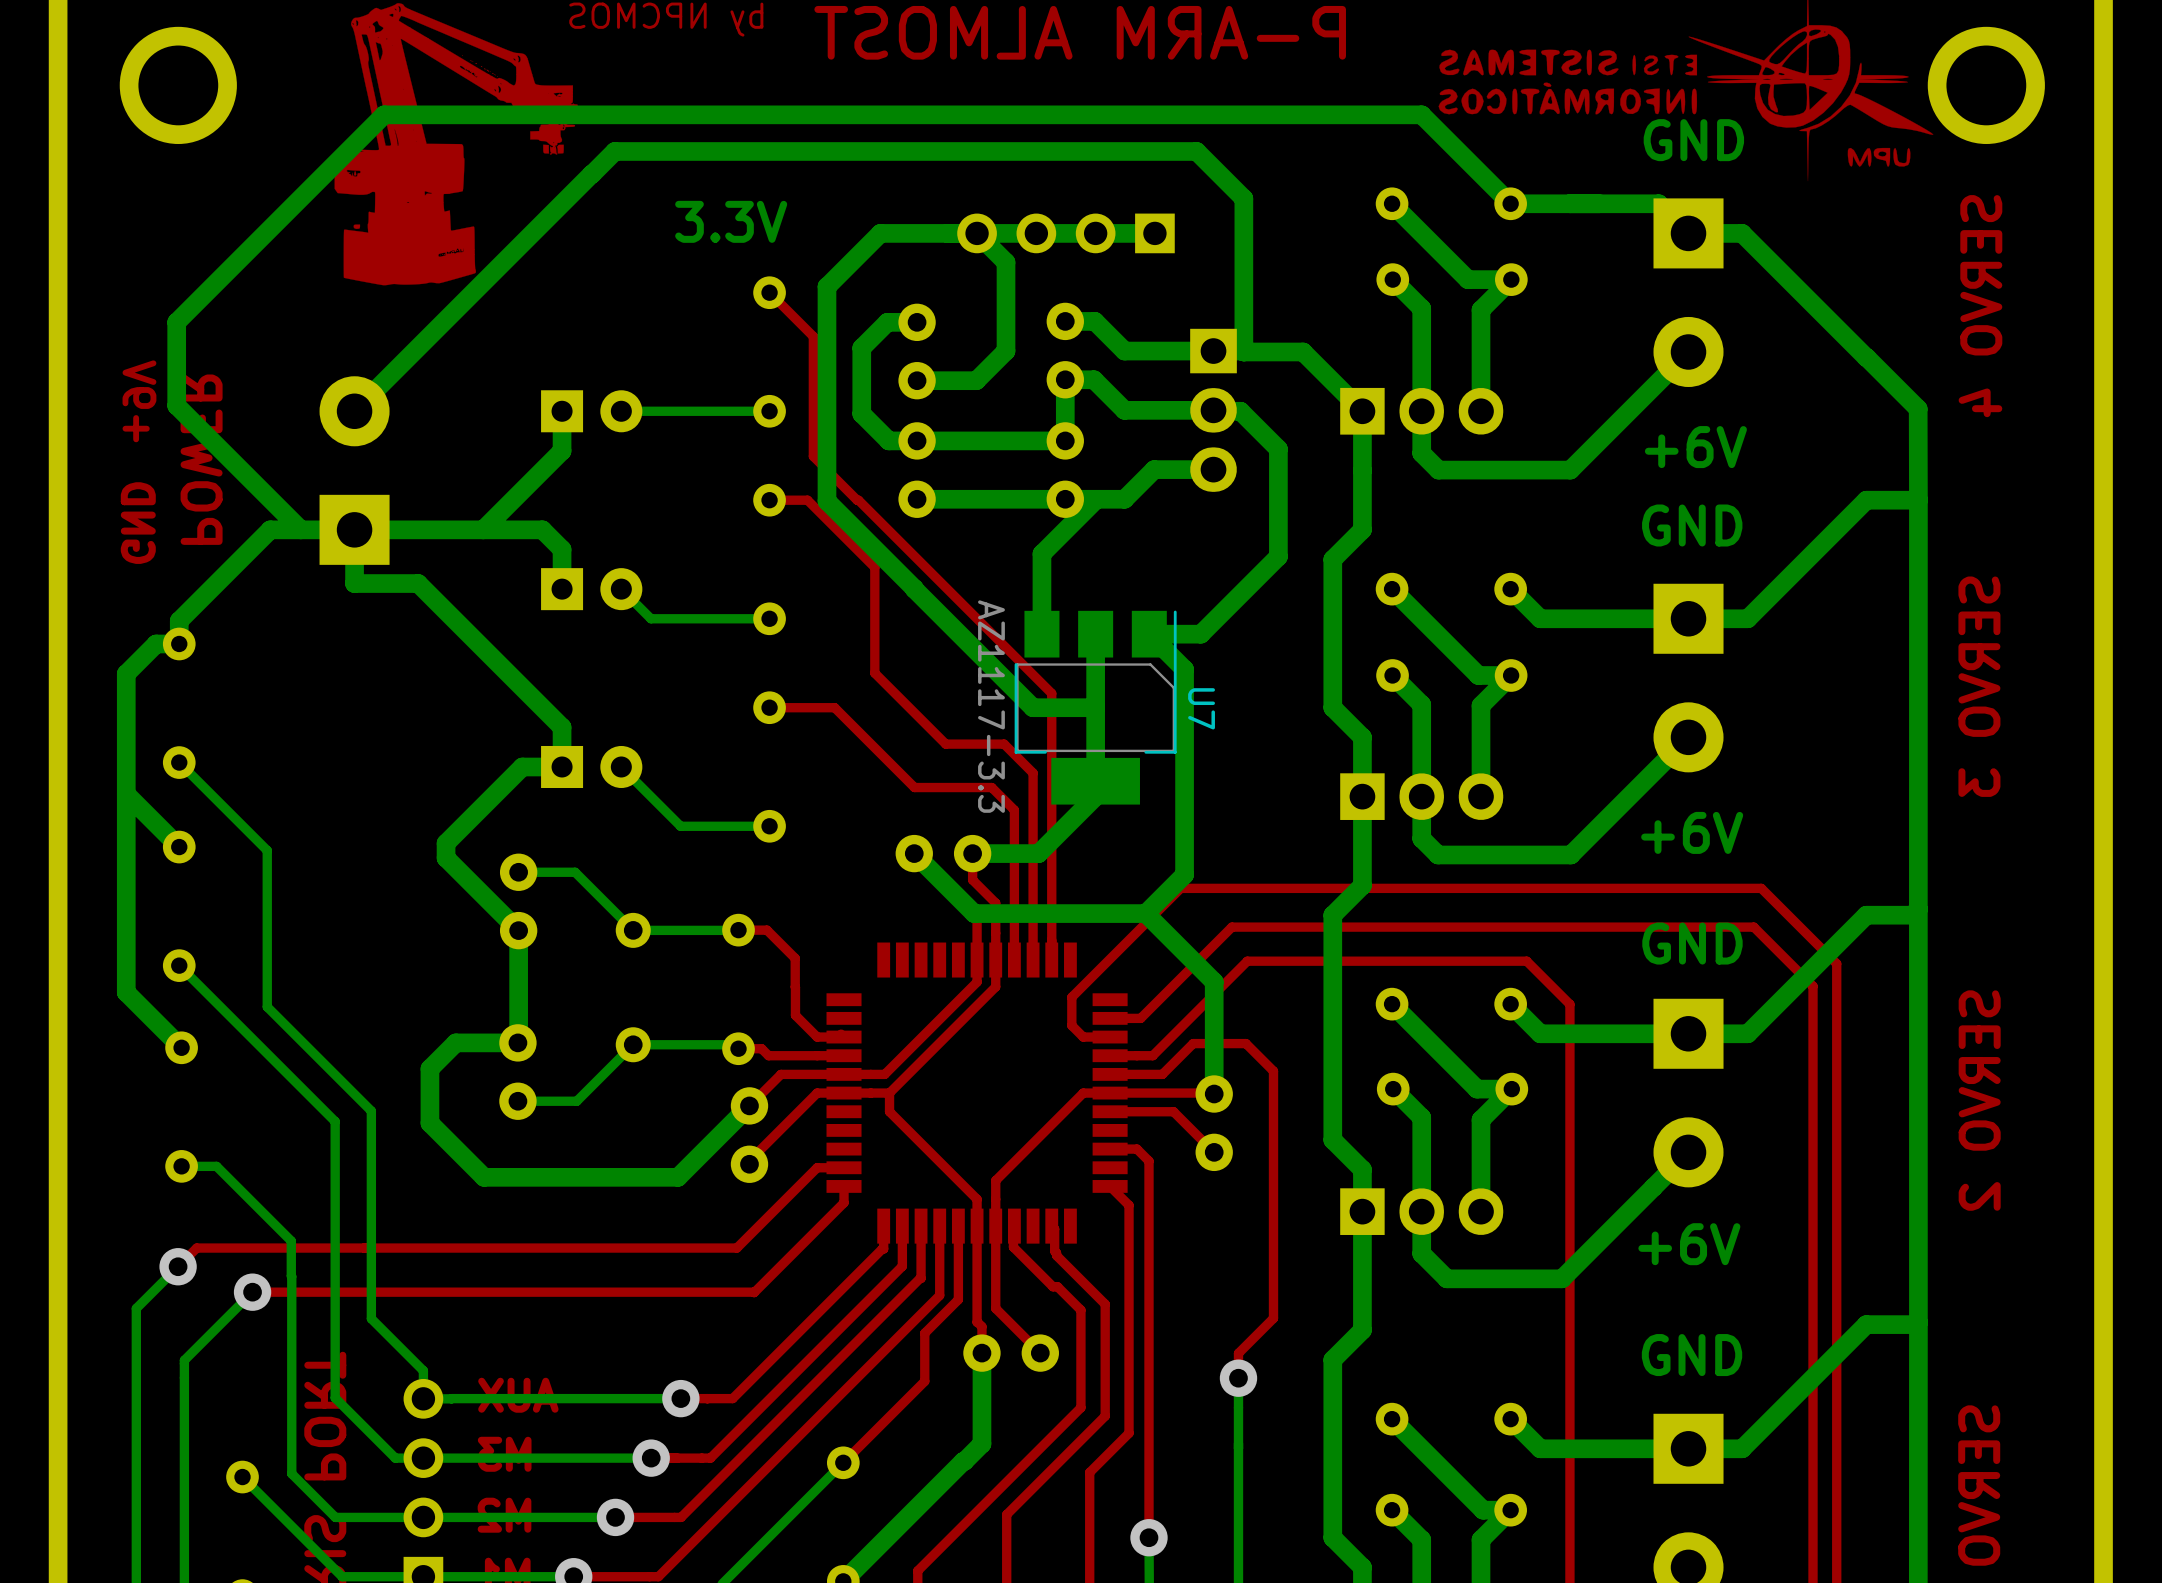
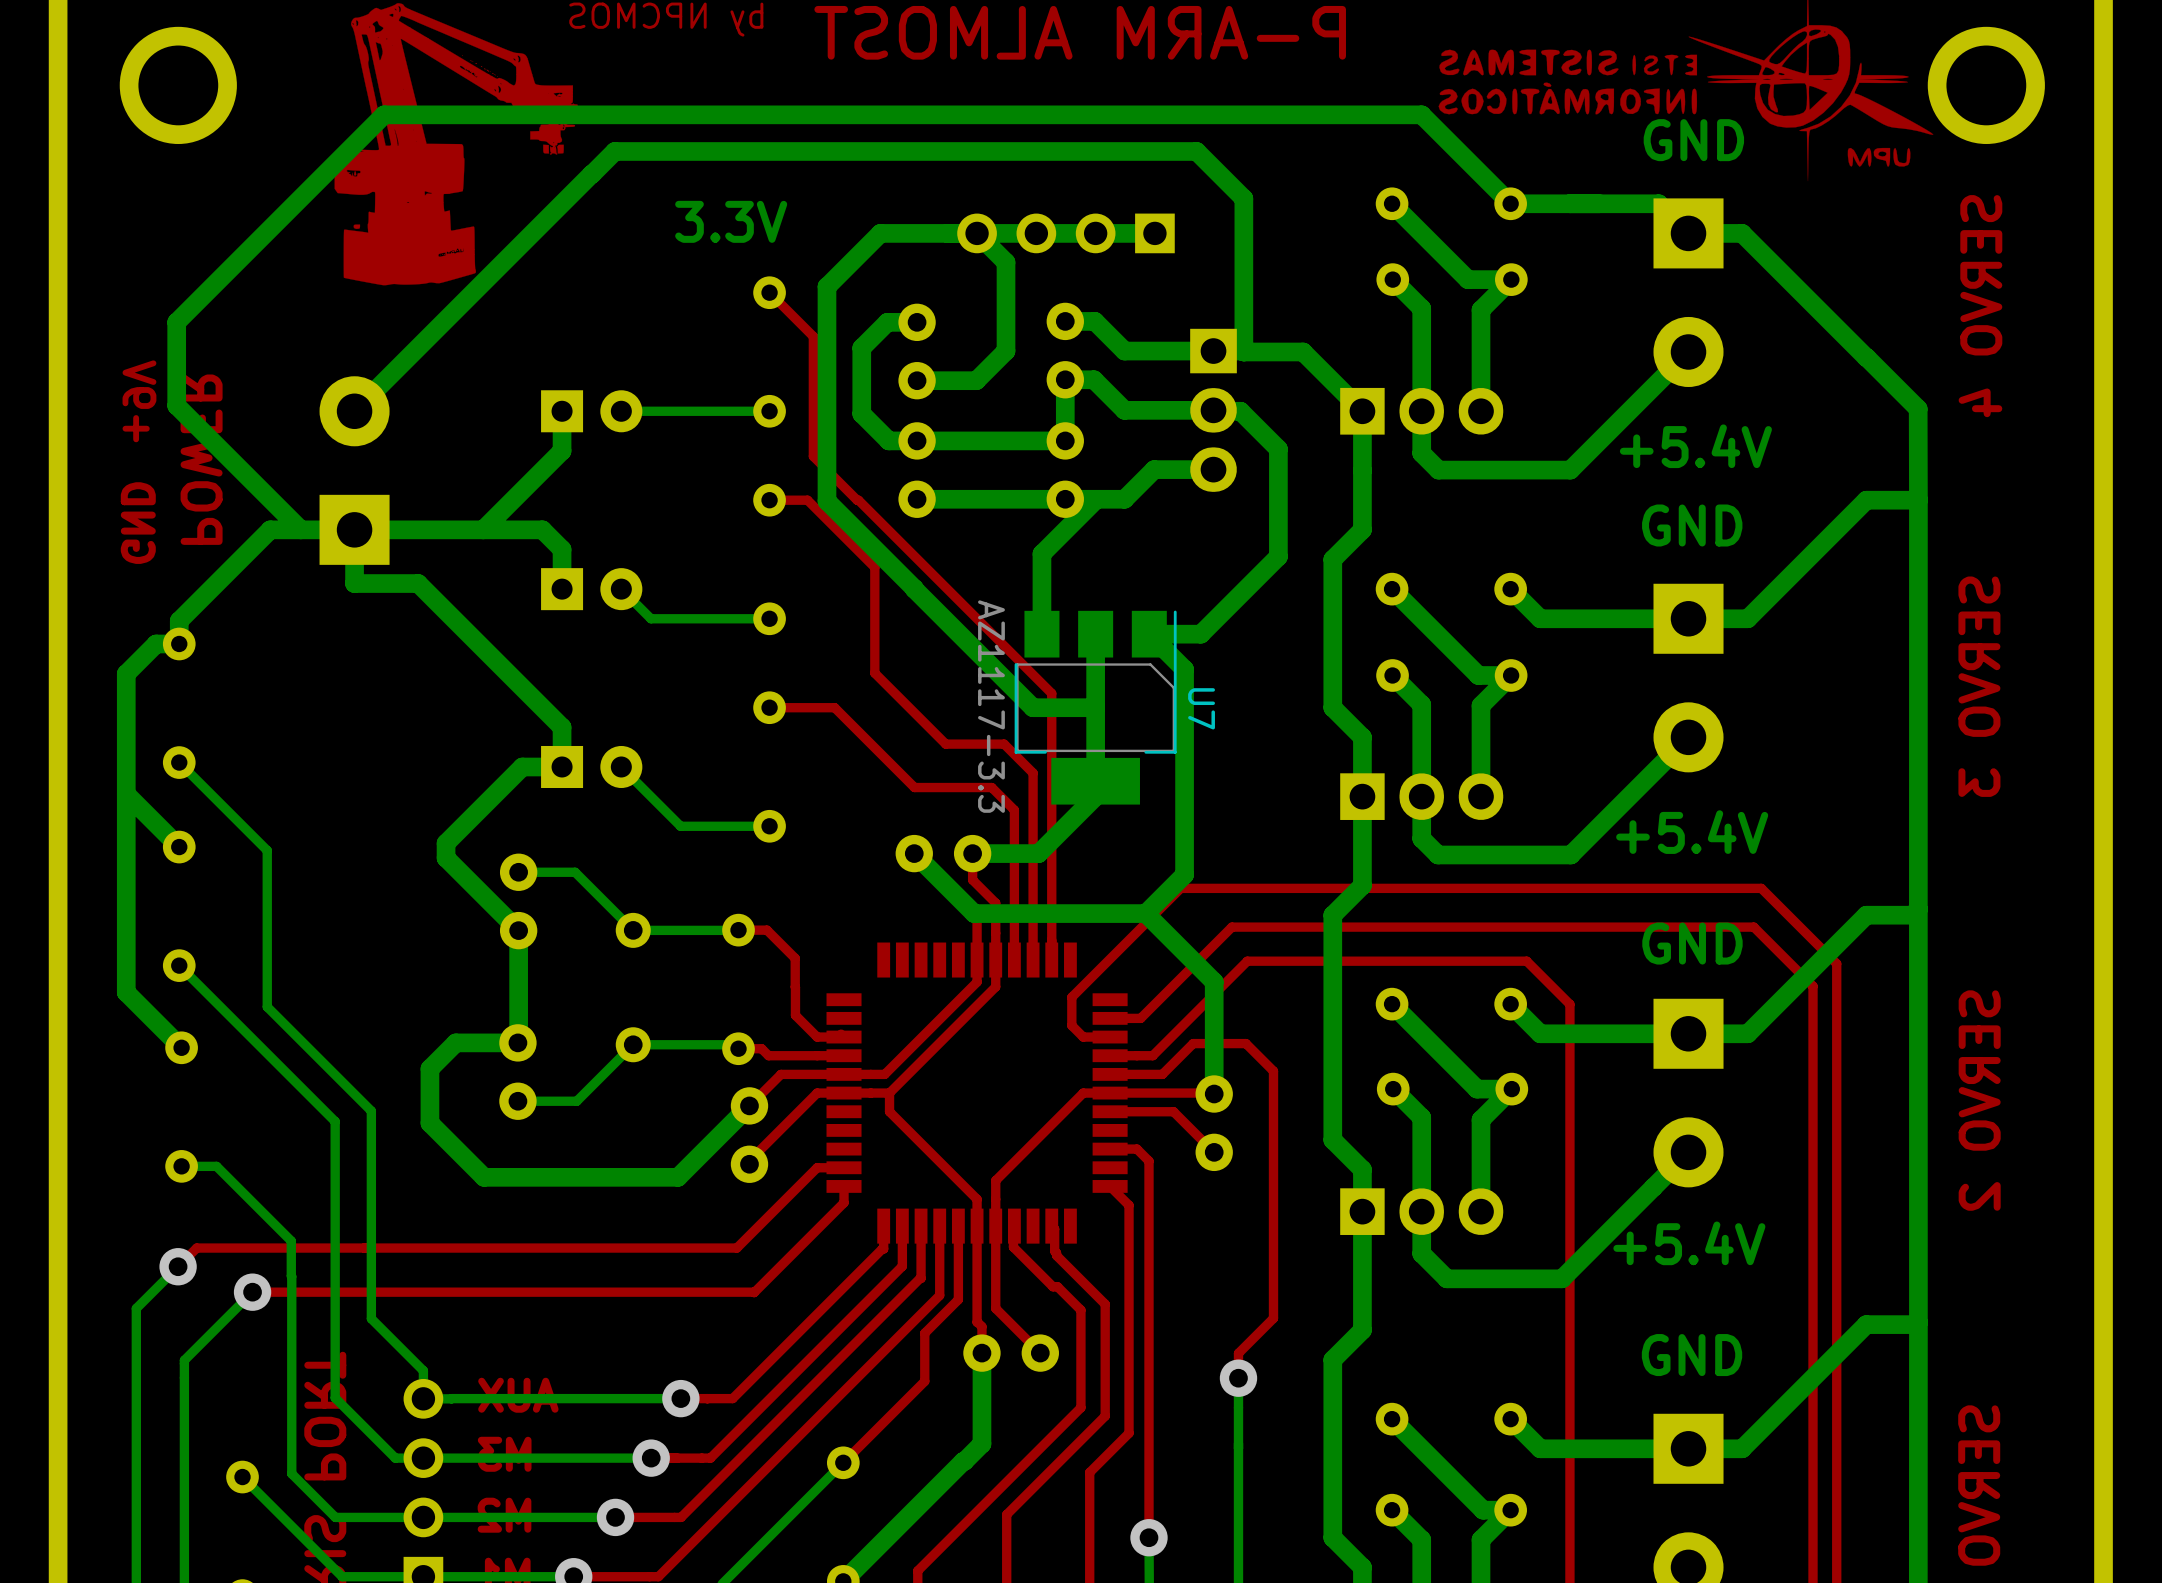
text: +6V (1695, 447) -> +5.4V (1695, 446)
text: +6V (1692, 832) -> +5.4V (1692, 832)
text: +6V (1689, 1244) -> +5.4V (1689, 1243)

